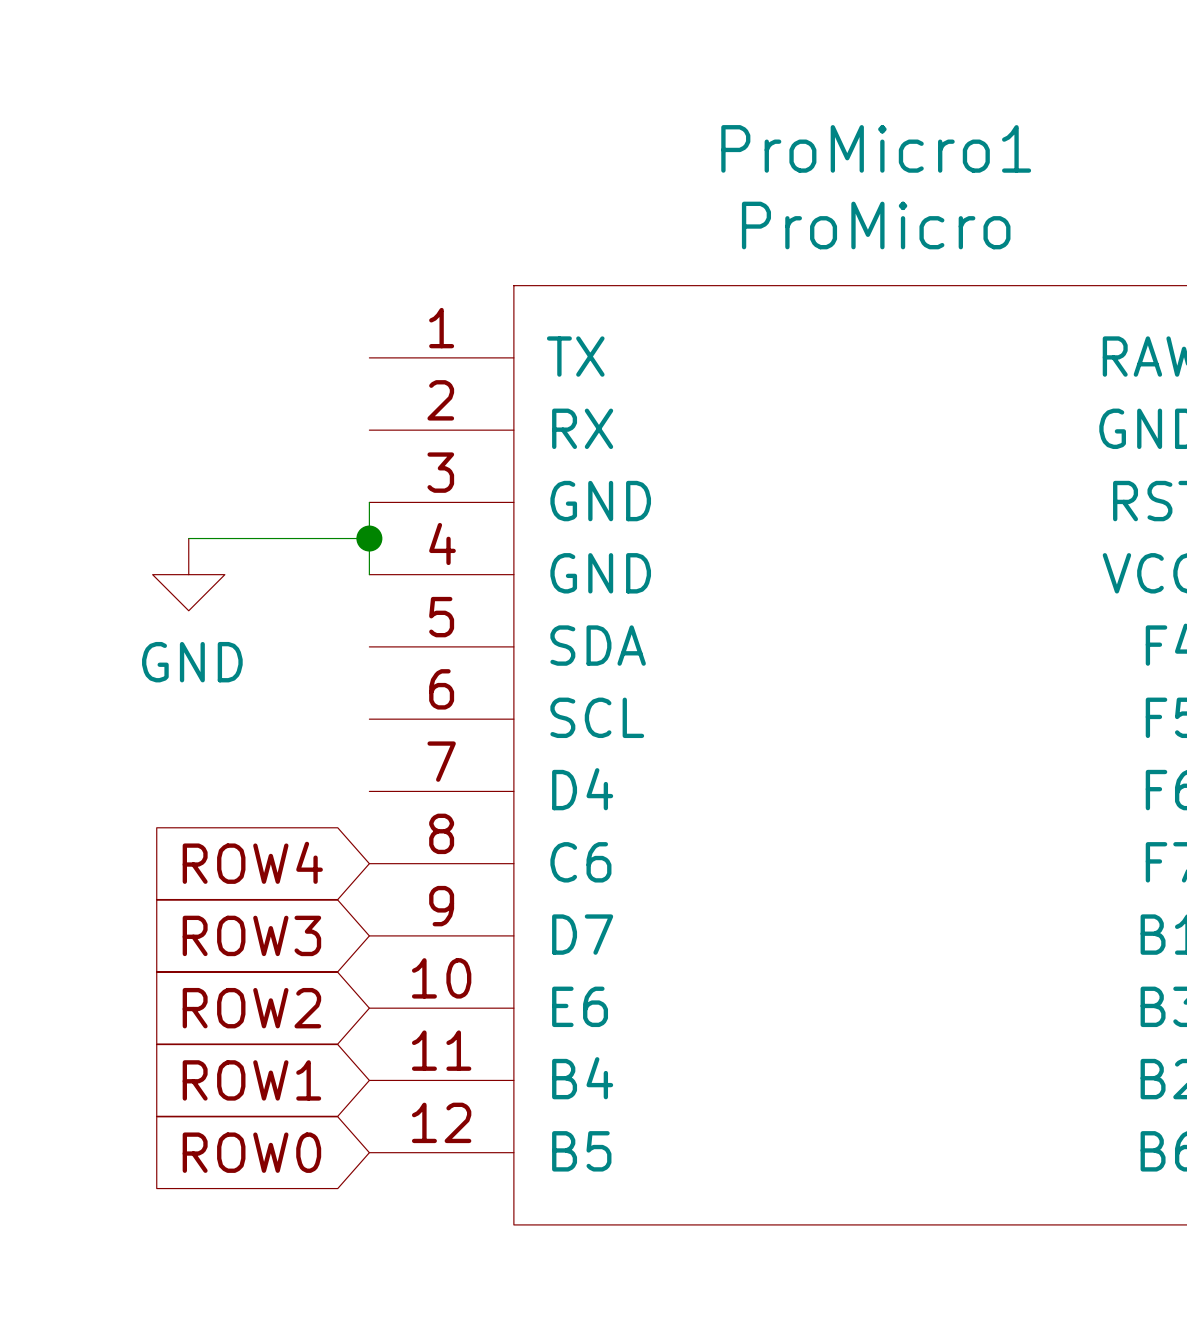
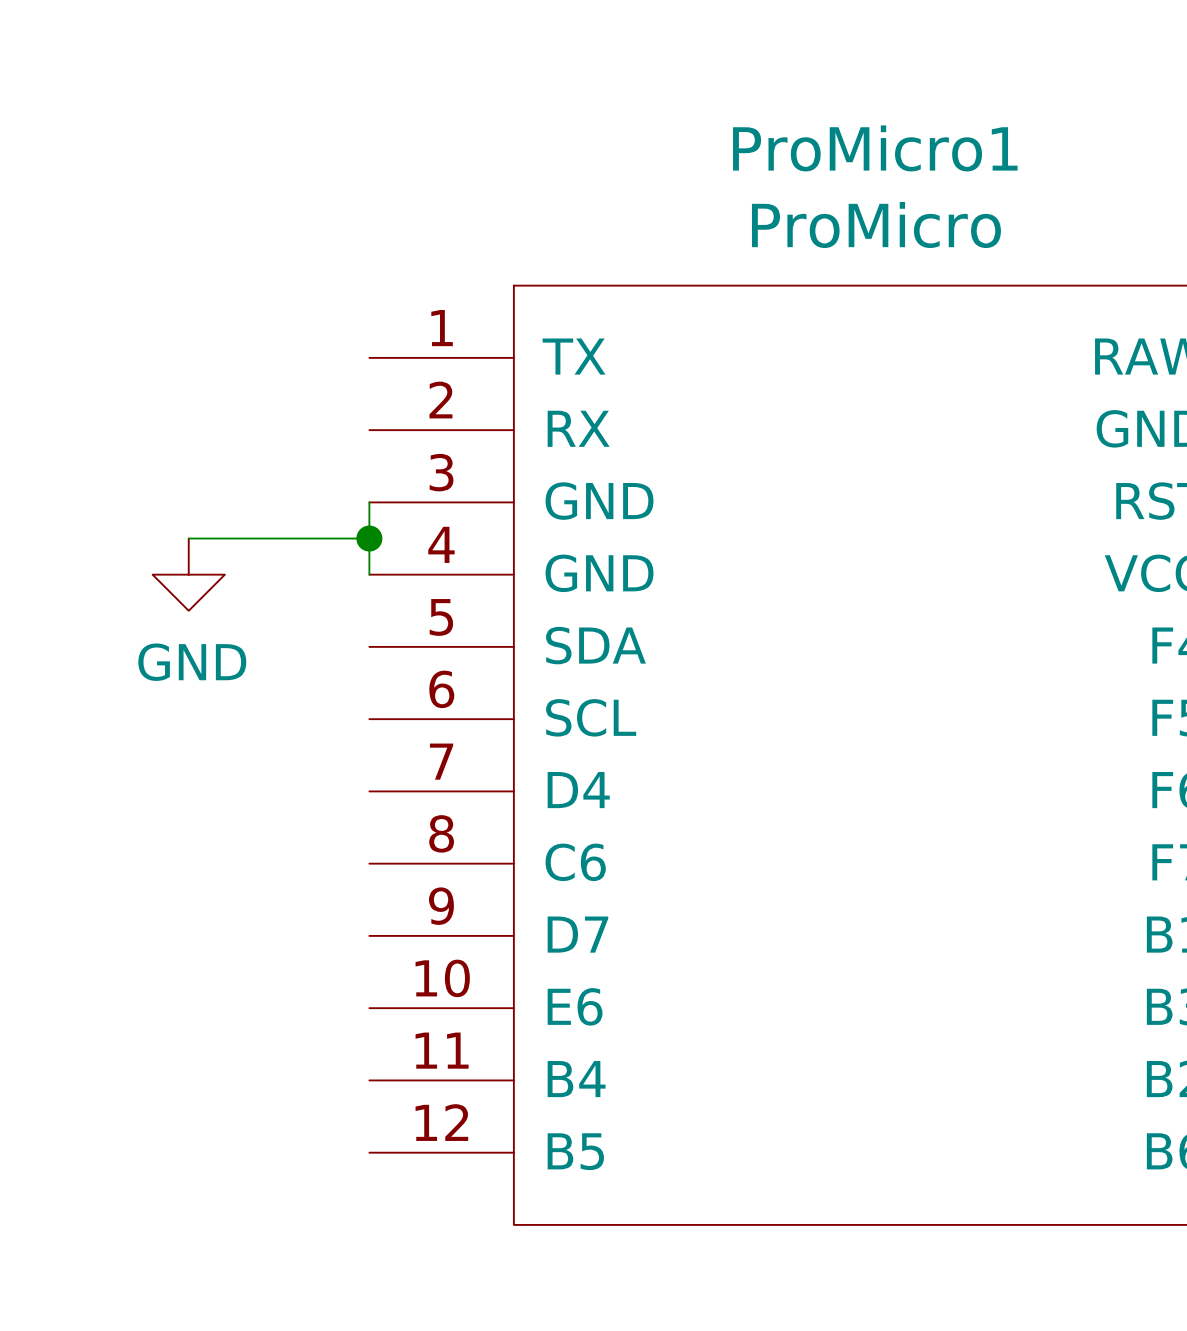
global label: ROW4 (252, 862) -> none
global label: ROW3 (251, 935) -> none
global label: ROW2 (251, 1008) -> none
global label: ROW1 (251, 1080) -> none
global label: ROW0 (251, 1152) -> none

